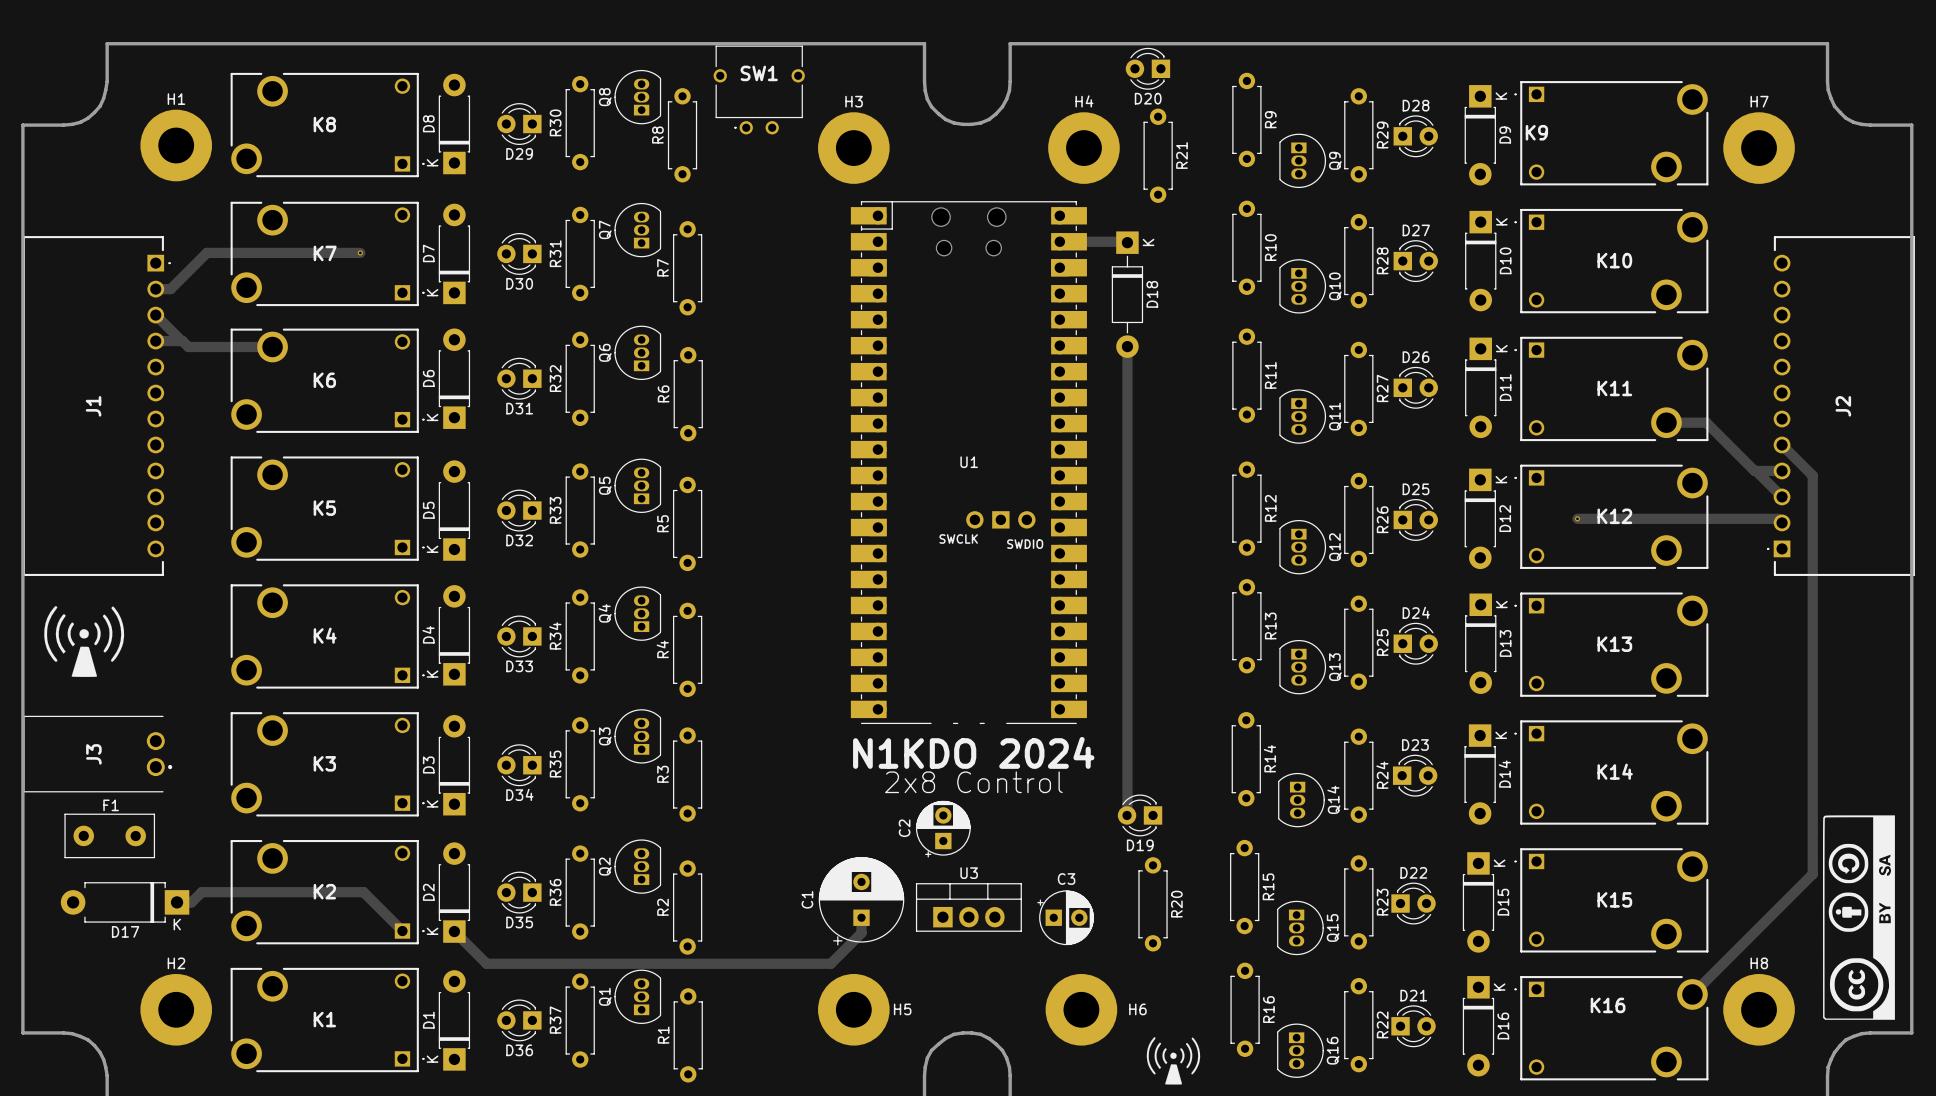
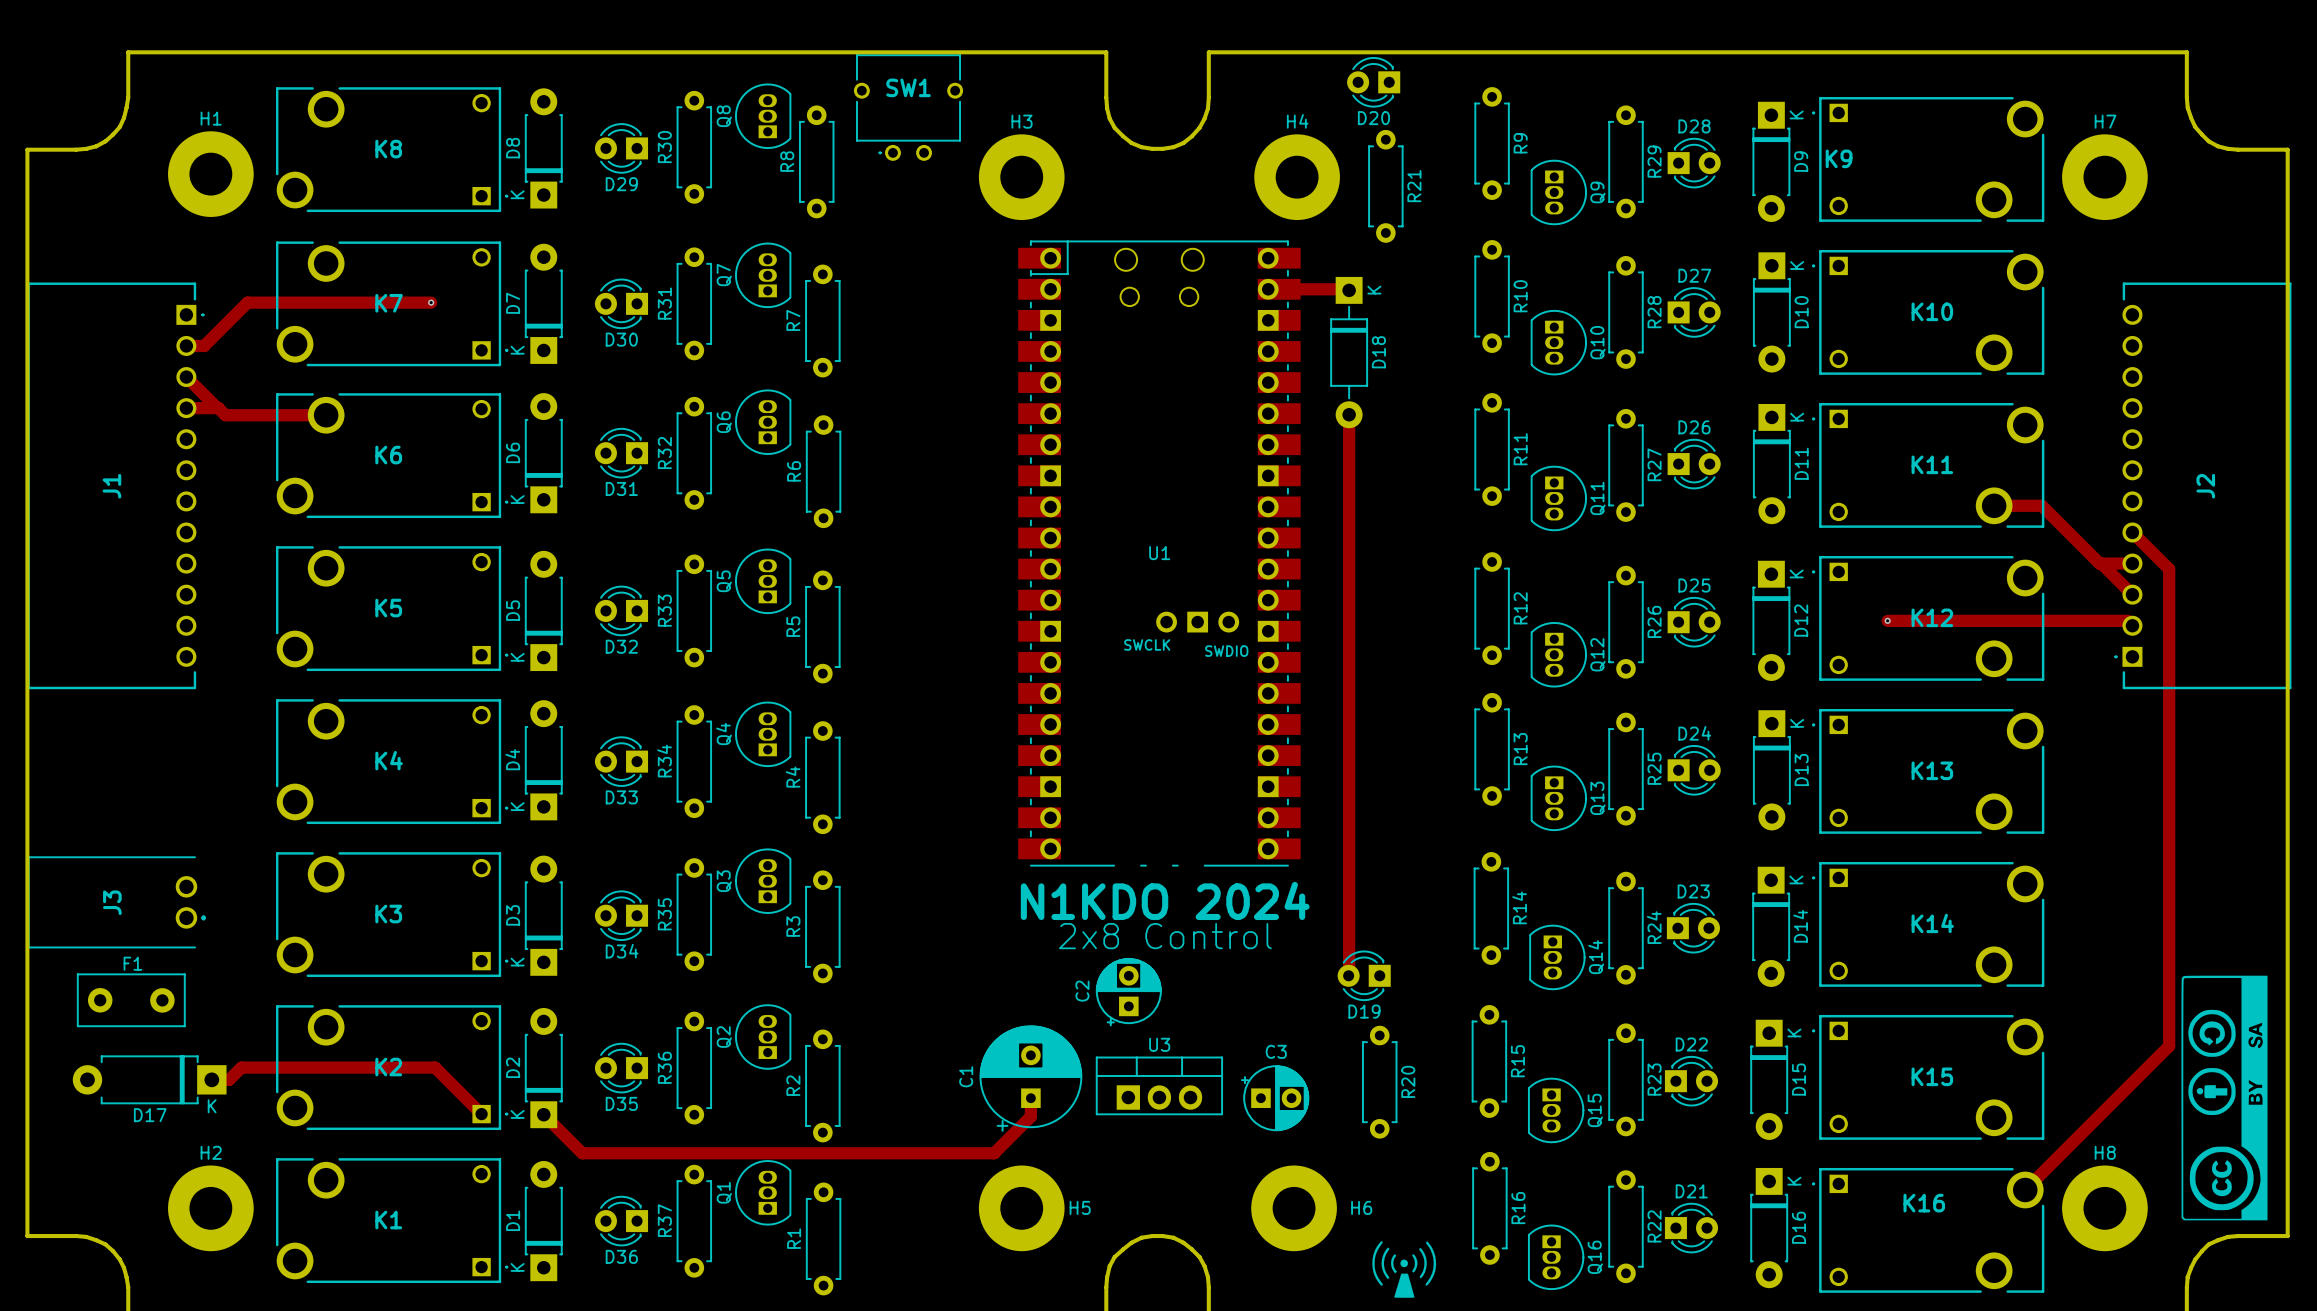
drawing: [44, 606, 125, 677] -> none

